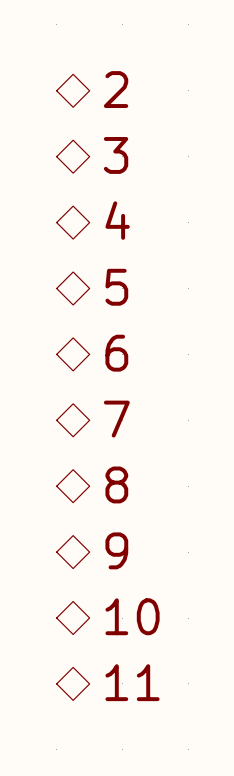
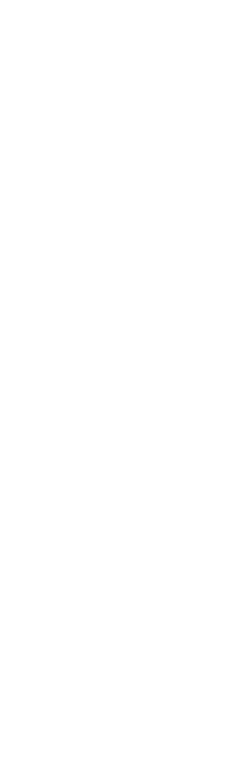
hierarchical label: 2 (116, 89) -> none
hierarchical label: 3 (116, 155) -> none
hierarchical label: 4 (117, 220) -> none
hierarchical label: 5 (116, 287) -> none
hierarchical label: 6 (116, 353) -> none
hierarchical label: 7 (116, 419) -> none
hierarchical label: 8 (116, 484) -> none
hierarchical label: 9 (116, 550) -> none
hierarchical label: 10 (132, 616) -> none
hierarchical label: 11 (132, 682) -> none

